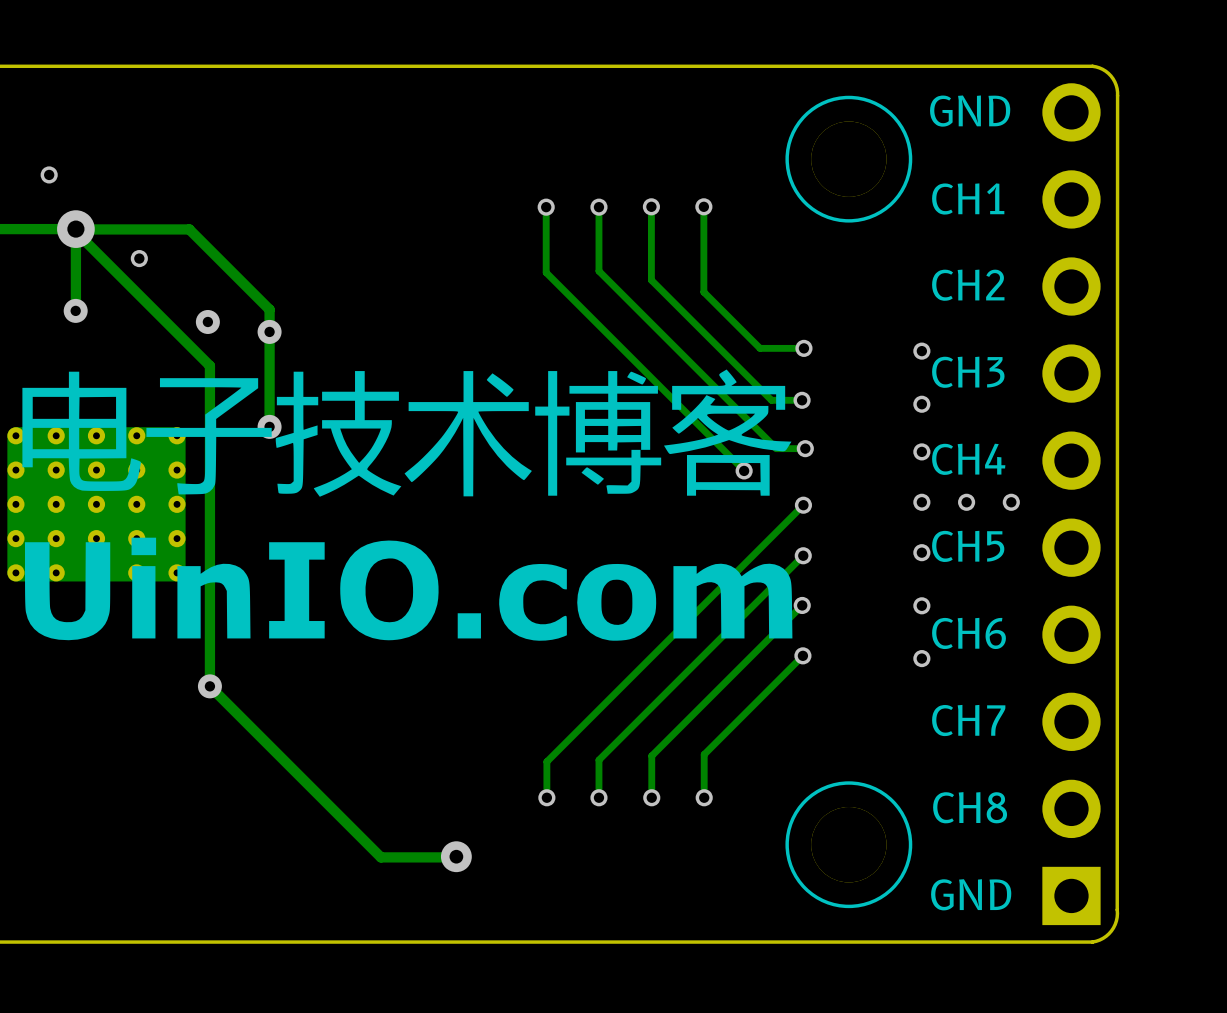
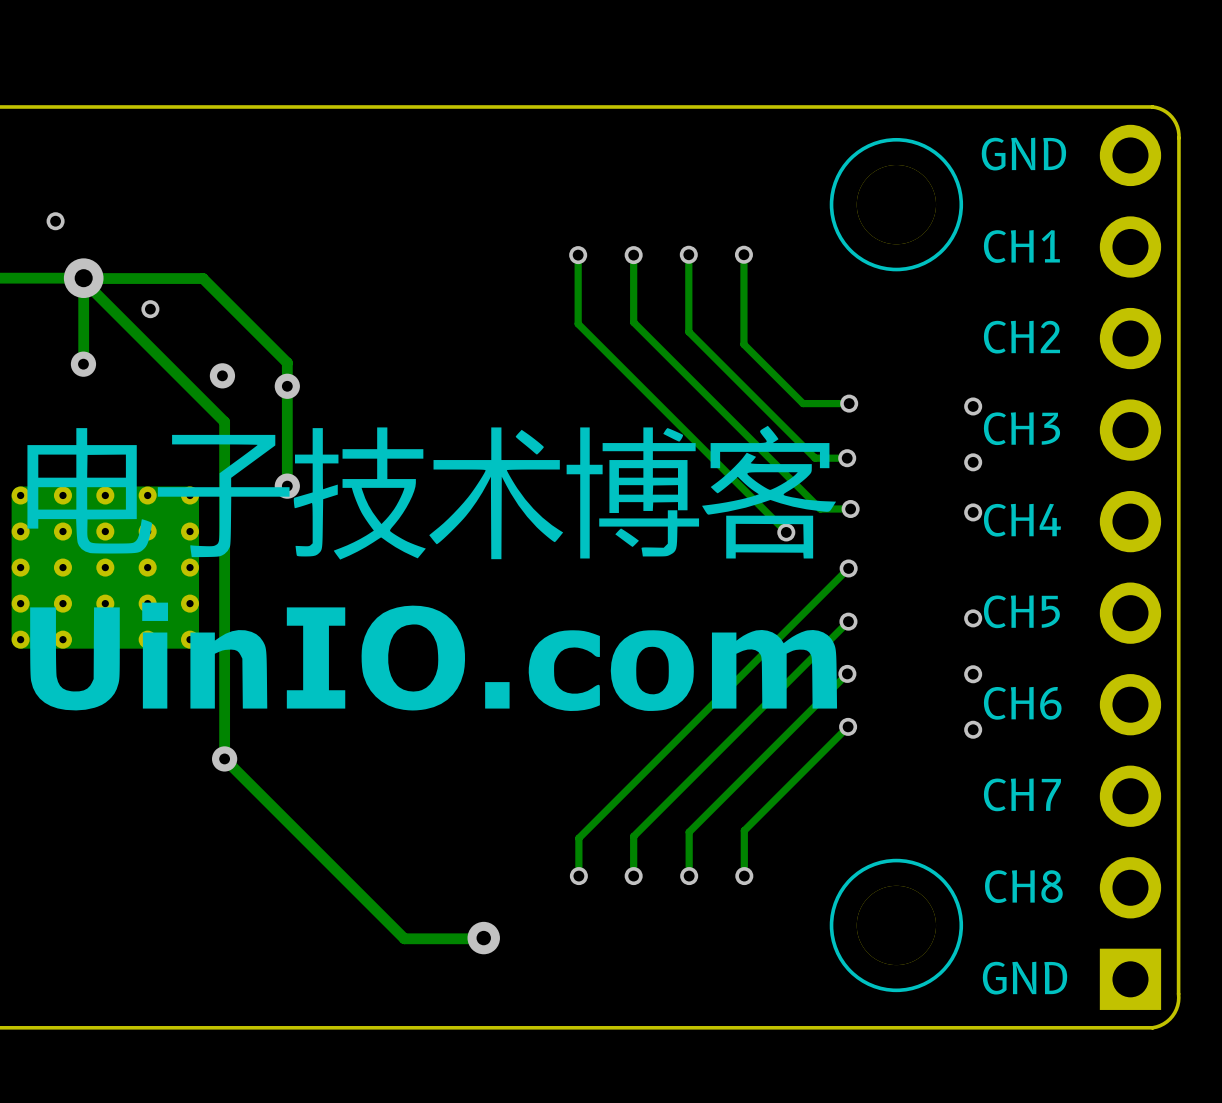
via: (921, 502) -> none
via: (966, 502) -> none
via: (1011, 502) -> none

